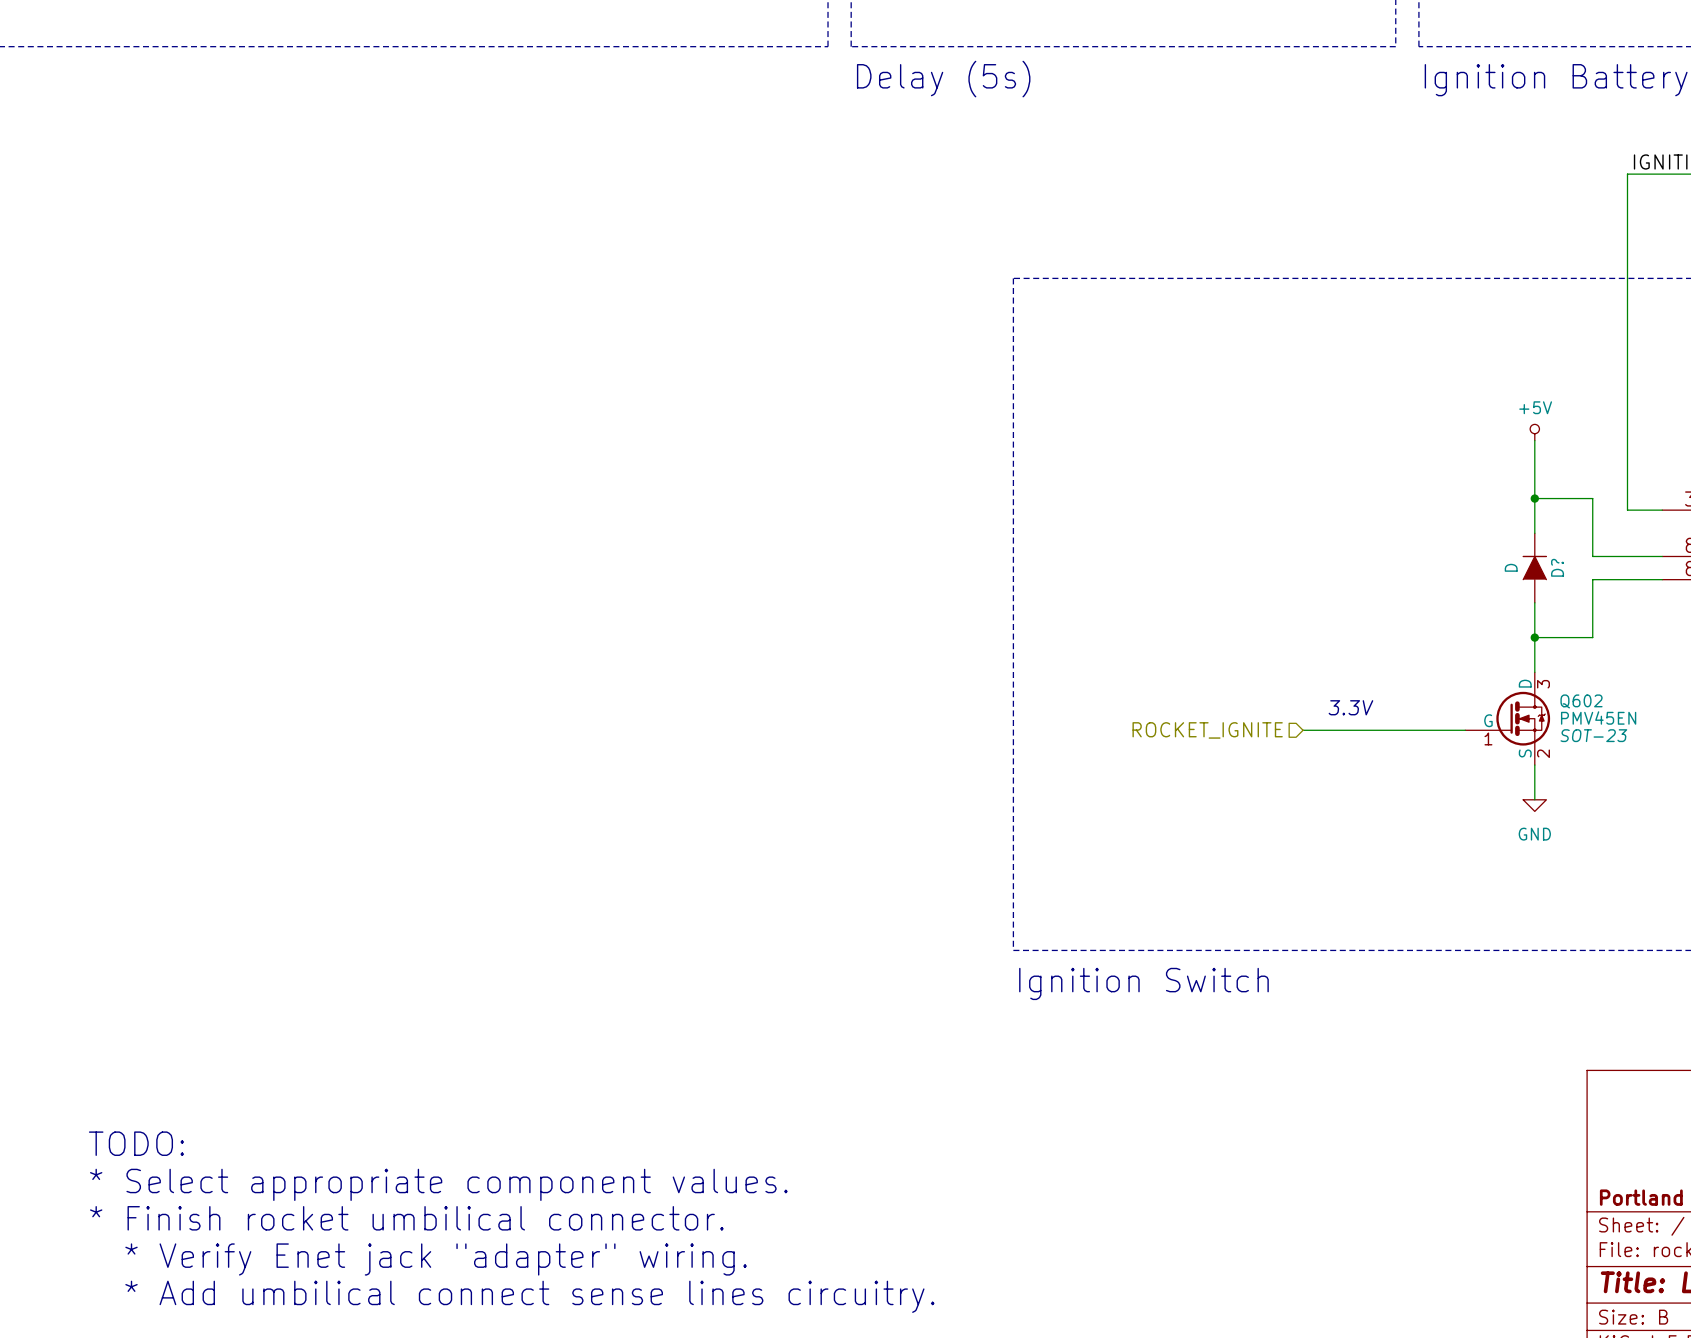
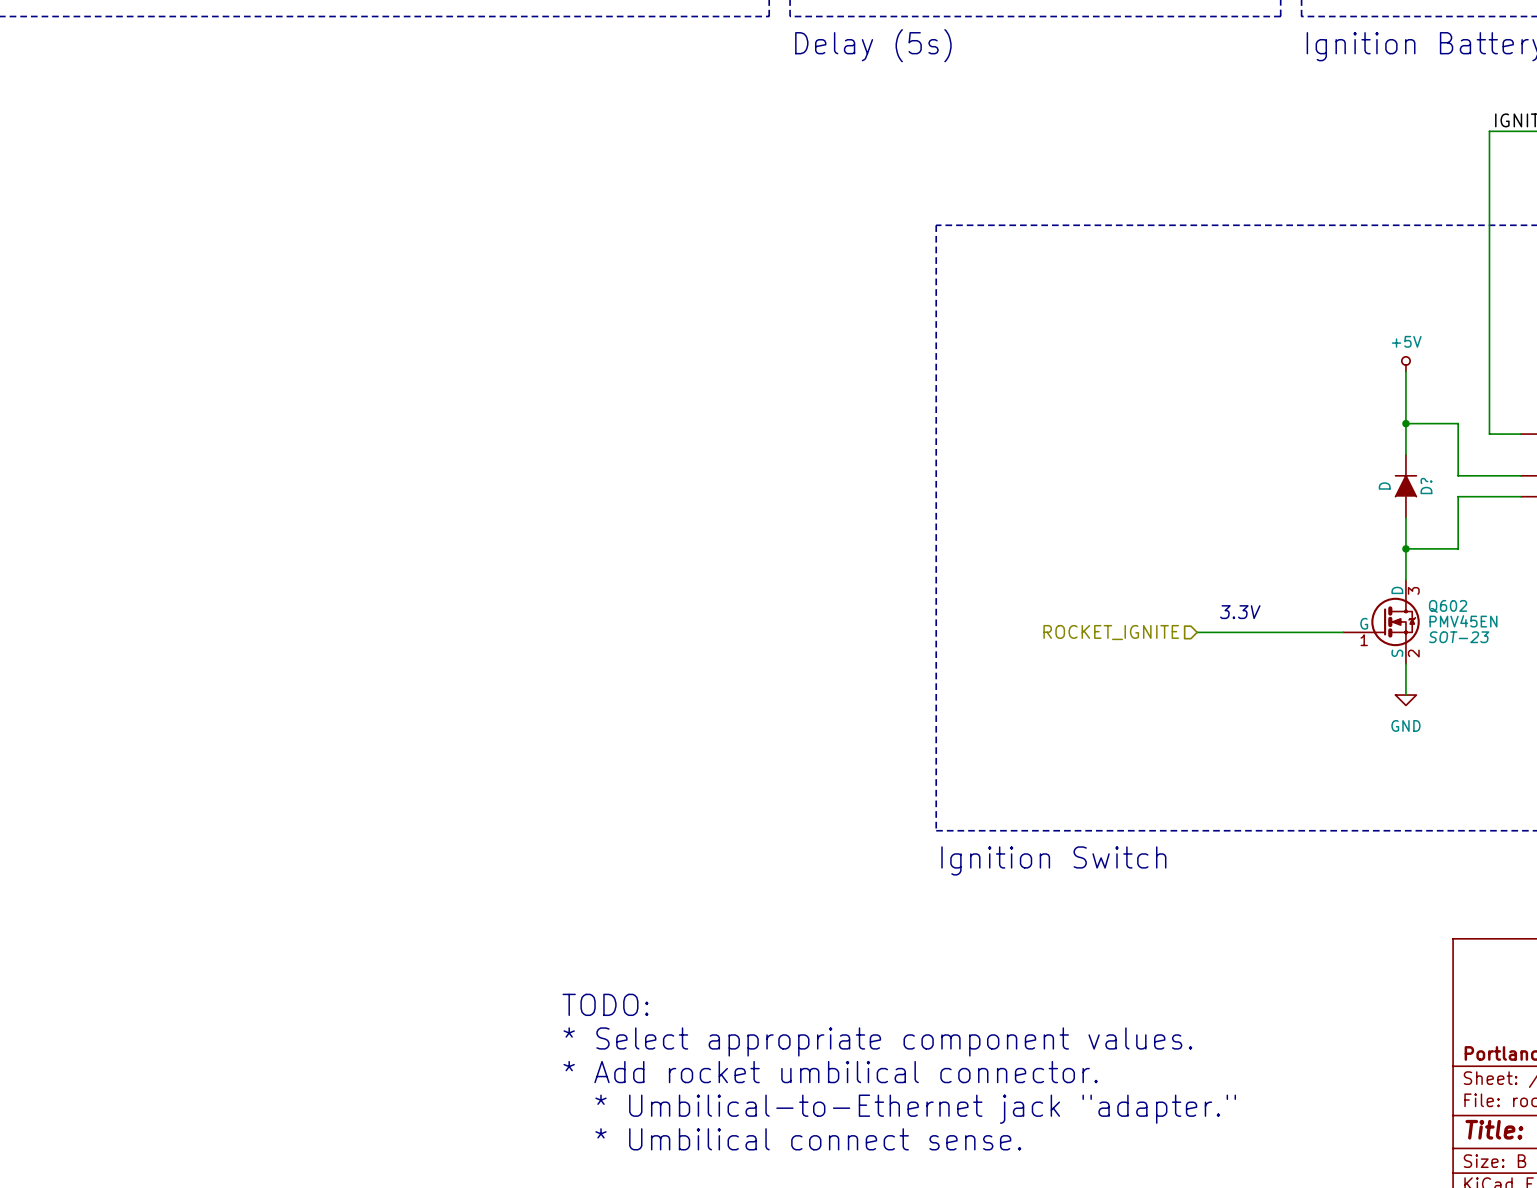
text: TODO: (136, 1143) -> none
text: none -> TODO: (605, 1004)
text: * Select appropriate component values. (438, 1184) -> none
text: none -> * Select appropriate component values. (877, 1041)
text: * Finish rocket umbilical connector. (406, 1218) -> none
text: none -> * Add rocket umbilical connector. (830, 1072)
text: * Verify Enet jack "adapter" wiring. (436, 1259) -> none
text: none -> * Umbilical-to-Ethernet jack "adapter." (915, 1109)
text: none -> * Umbilical connect sense. (808, 1139)
text: * Add umbilical connect sense lines circuitry. (529, 1296) -> none

